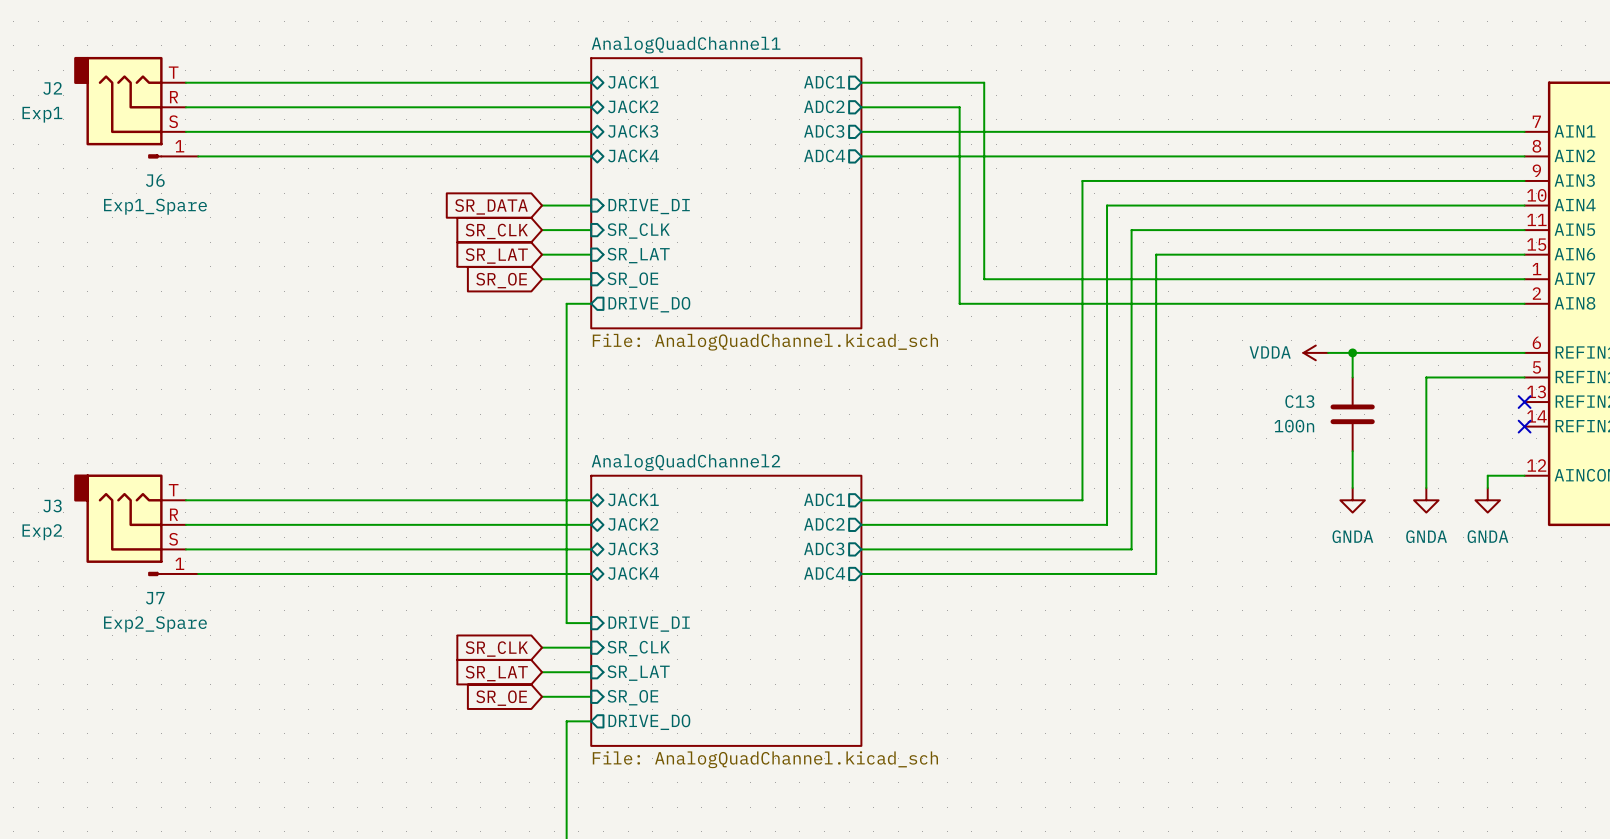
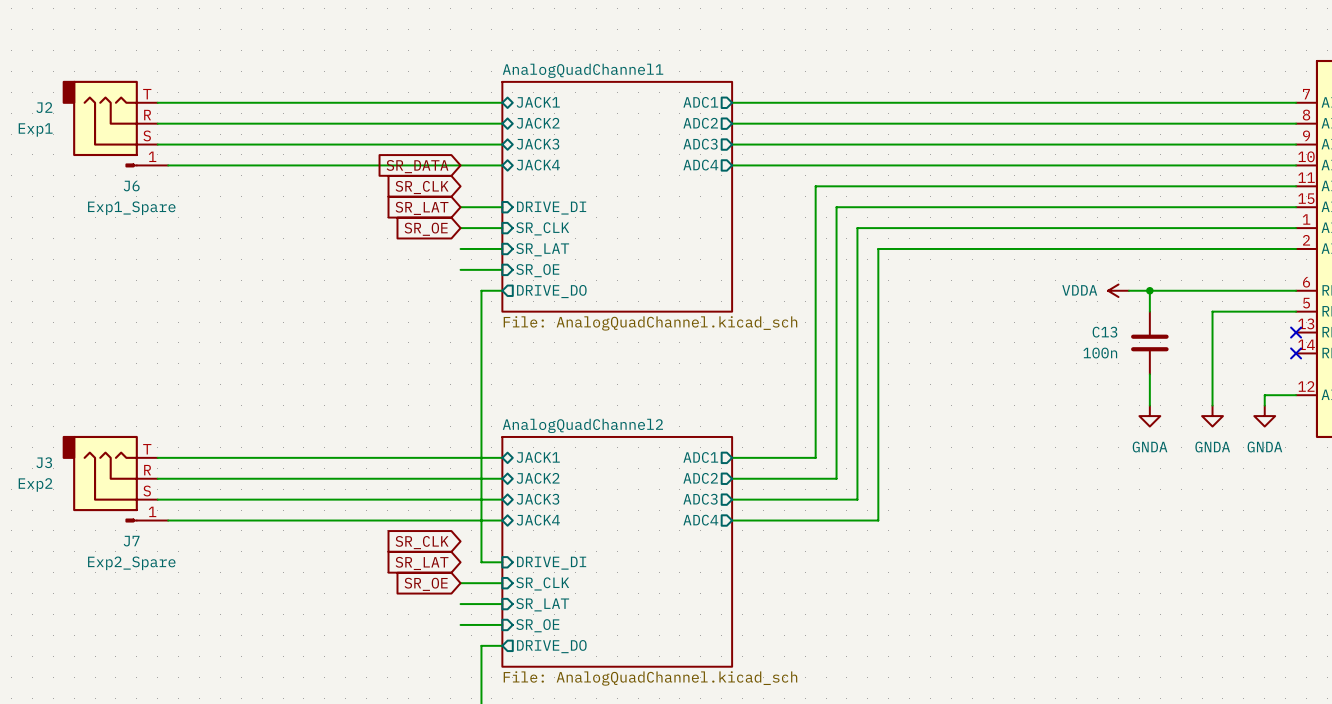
wire: (185, 82) (591, 82) -> (157, 144) (502, 144)
sheet pin: JACK1 (633, 82) -> none
sheet pin: ADC1 (824, 82) -> none
wire: (861, 82) (984, 82) (984, 254) -> (982, 207) (836, 207)
J2 position: (130, 101) -> (110, 118)
sheet pin: JACK2 (633, 106) -> none
sheet pin: ADC2 (824, 106) -> none
wire: (185, 107) (591, 107) -> none
wire: (861, 107) (959, 107) (959, 230) -> (961, 186) (815, 186)
sheet pin: JACK3 (633, 131) -> JACK1 (538, 102)
sheet pin: ADC3 (824, 131) -> ADC1 (700, 102)
sheet pin: JACK4 (633, 155) -> JACK2 (538, 123)
sheet pin: ADC4 (824, 155) -> ADC2 (700, 123)
J6 position: (173, 156) -> (146, 165)
sheet pin: none -> JACK3 (538, 144)
sheet pin: none -> ADC3 (700, 144)
wire: (1082, 180) (1082, 500) (861, 500) -> (920, 144) (732, 144)
sheet AnalogQuadChannel1 position: (726, 193) -> (617, 196)
wire: none -> (168, 165) (460, 165)
sheet pin: none -> ADC4 (700, 165)
wire: (1107, 205) (1107, 524) (861, 524) -> (940, 165) (732, 165)
sheet pin shape: input (649, 206) -> bidirectional (538, 165)
sheet pin: DRIVE_DI (649, 206) -> JACK4 (538, 165)
wire: (542, 230) (591, 230) -> (460, 269) (502, 269)
wire: (1131, 230) (1131, 549) (959, 549) -> (815, 248) (815, 457)
sheet pin: SR_CLK (638, 231) -> none
wire: (1156, 254) (1156, 573) (984, 573) -> (836, 228) (836, 478)
sheet pin: SR_LAT (638, 255) -> DRIVE_DI (551, 208)
wire: (984, 279) (1008, 279) -> (732, 499) (857, 499) (857, 228)
sheet pin: SR_OE (632, 280) -> SR_CLK (542, 228)
wire: (566, 303) (566, 352) -> (481, 248) (460, 248)
wire: (959, 303) (1033, 303) -> (732, 520) (878, 520) (878, 248)
sheet pin shape: output (649, 304) -> input (542, 249)
sheet pin: DRIVE_DO (649, 304) -> SR_LAT (542, 249)
sheet pin: none -> SR_OE (537, 270)
wire: none -> (481, 290) (502, 290)
sheet pin: none -> DRIVE_DO (551, 291)
sheet pin: JACK1 (633, 499) -> none
sheet pin: ADC1 (824, 499) -> none
wire: (185, 500) (591, 500) -> (157, 499) (502, 499)
J3 position: (130, 518) -> (110, 473)
wire: (185, 524) (591, 524) -> none
sheet pin: JACK2 (633, 524) -> none
sheet pin: ADC2 (824, 524) -> none
sheet pin: JACK3 (633, 548) -> JACK1 (538, 457)
sheet pin: ADC3 (824, 548) -> ADC1 (700, 457)
J7 position: (173, 573) -> (146, 520)
sheet pin: JACK4 (633, 573) -> JACK2 (538, 478)
sheet pin: ADC4 (824, 573) -> ADC2 (700, 478)
sheet pin: none -> JACK3 (538, 499)
sheet pin: none -> ADC3 (700, 499)
sheet AnalogQuadChannel2 position: (726, 610) -> (617, 551)
sheet pin: none -> ADC4 (700, 520)
sheet pin shape: input (649, 624) -> bidirectional (538, 520)
sheet pin: DRIVE_DI (649, 624) -> JACK4 (538, 520)
wire: (542, 647) (591, 647) -> (460, 624) (502, 624)
sheet pin: SR_CLK (638, 648) -> none
wire: (542, 672) (566, 672) -> (168, 520) (481, 520) (481, 562)
sheet pin: SR_LAT (638, 673) -> DRIVE_DI (551, 563)
sheet pin: SR_OE (632, 697) -> SR_CLK (542, 583)
wire: (566, 721) (566, 770) -> (481, 604) (460, 604)
sheet pin shape: output (649, 722) -> input (542, 604)
sheet pin: DRIVE_DO (649, 722) -> SR_LAT (542, 604)
sheet pin: none -> SR_OE (537, 625)
wire: none -> (481, 645) (502, 645)
sheet pin: none -> DRIVE_DO (551, 646)

